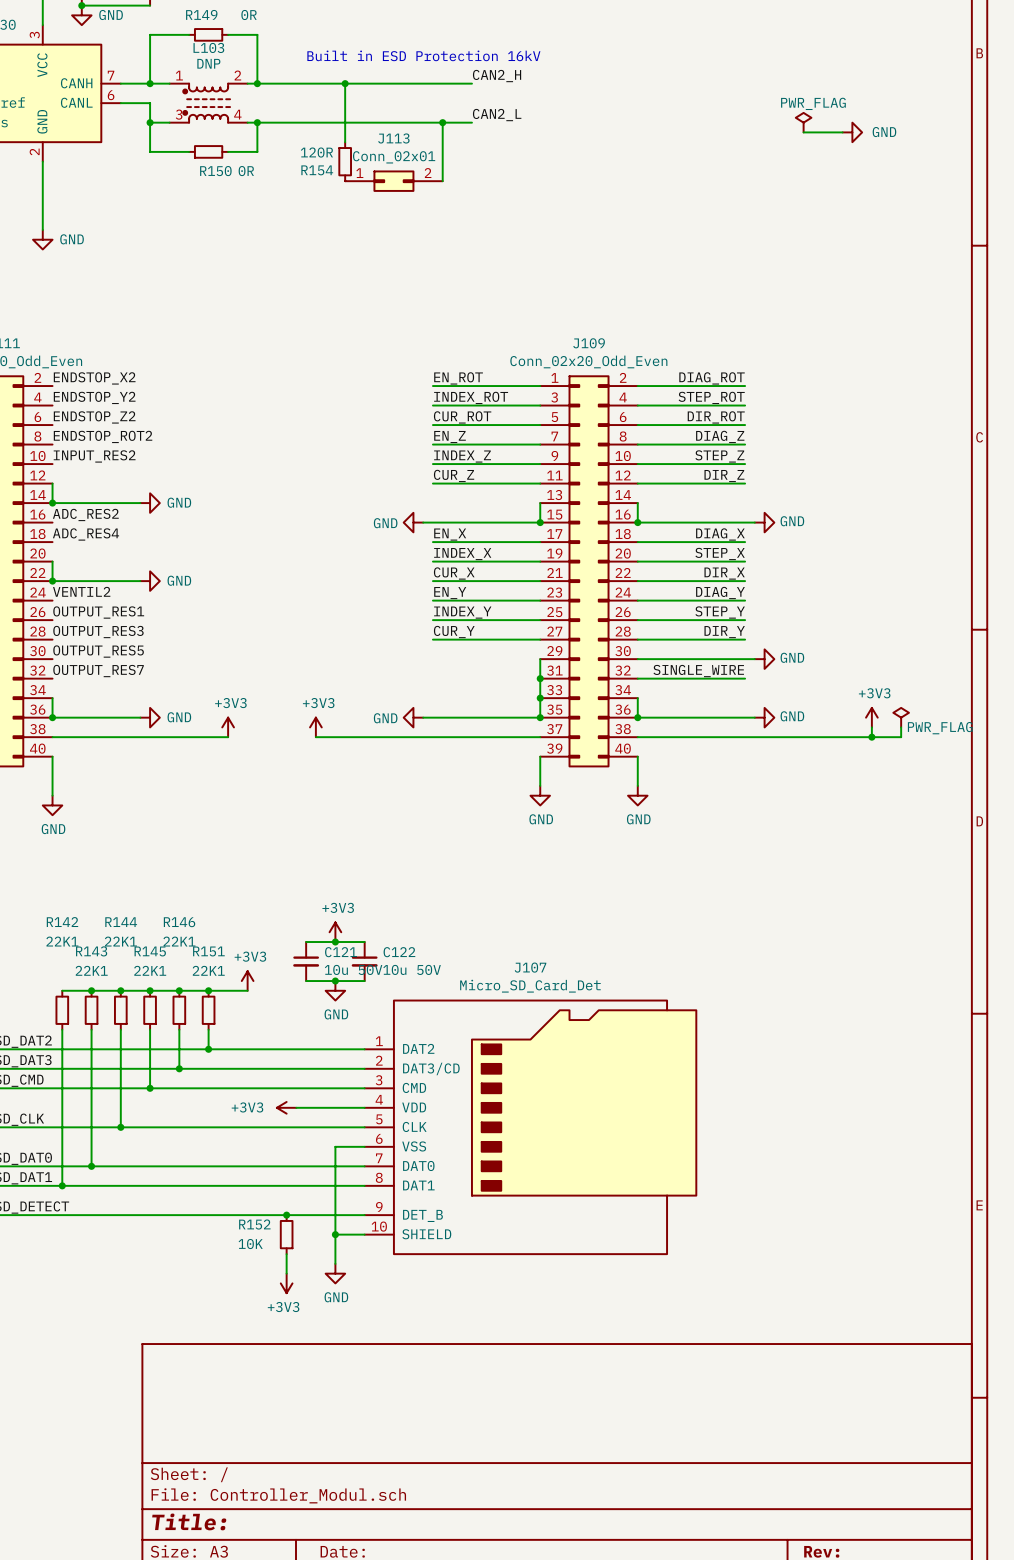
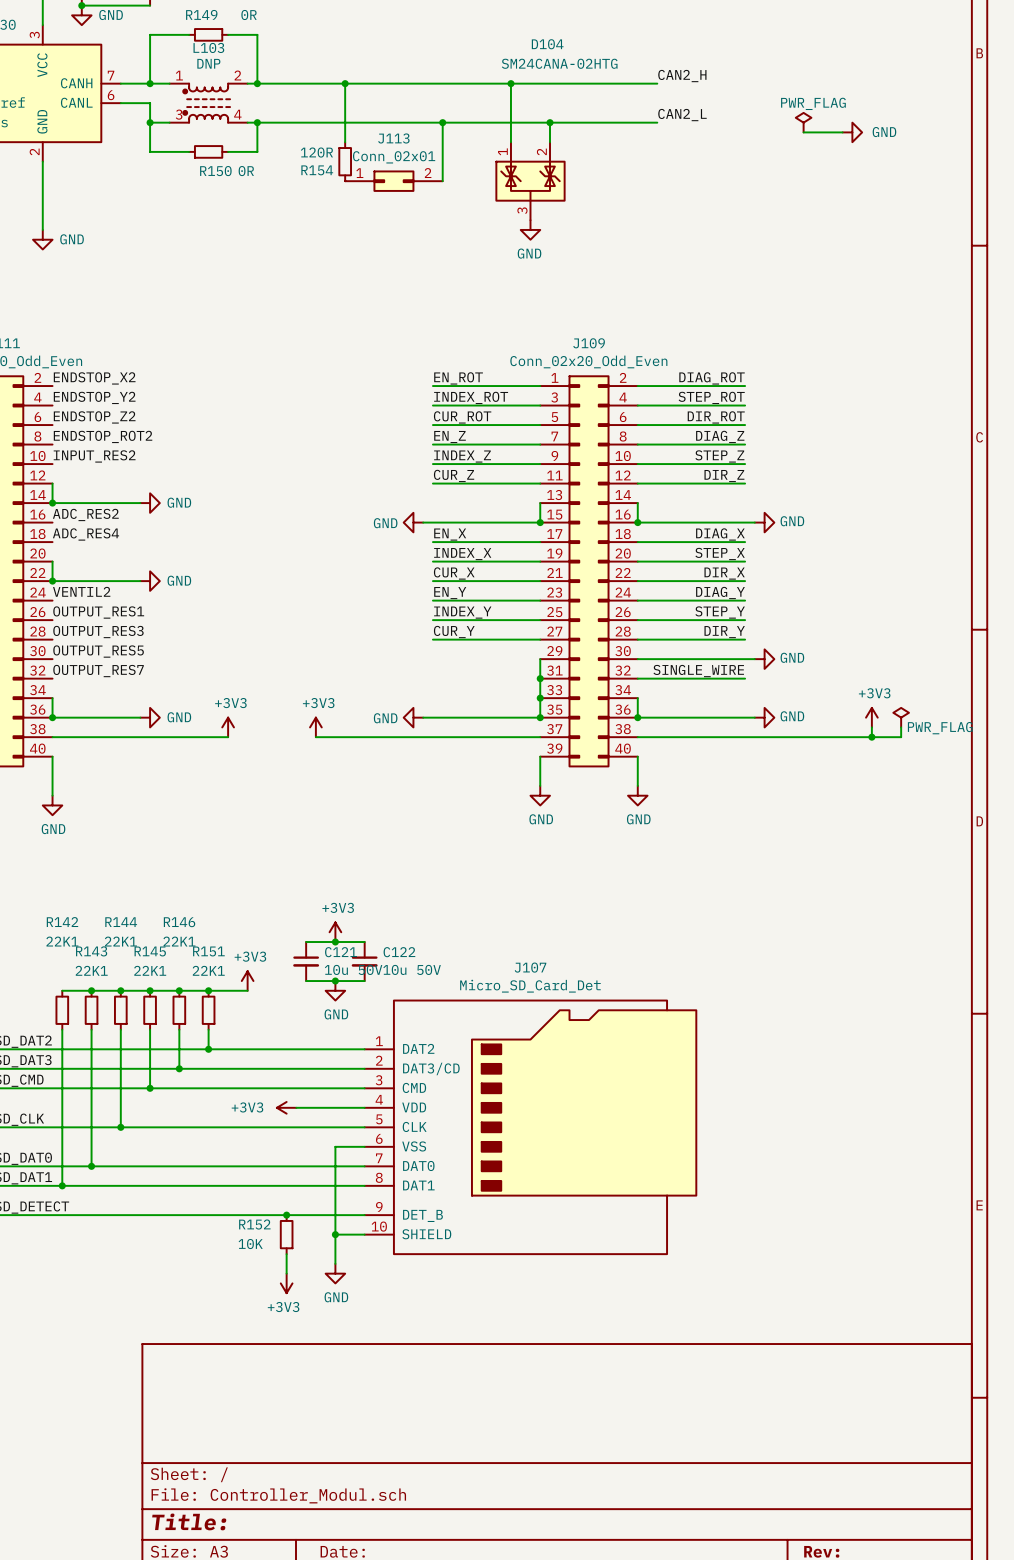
text: Built in ESD Protection 16kV (423, 55) -> none
label position: CAN2_H (497, 76) -> CAN2_H (682, 76)
wire: none -> (471, 83) (657, 83)
wire: none -> (510, 83) (510, 142)
junction: none -> (510, 83)
label position: CAN2_L (497, 115) -> CAN2_L (682, 115)
wire: none -> (471, 122) (657, 122)
wire: none -> (550, 122) (550, 142)
junction: none -> (550, 122)
D104: none -> SM24CANA-02HTG (530, 181)
power symbol: none -> GND (530, 229)

